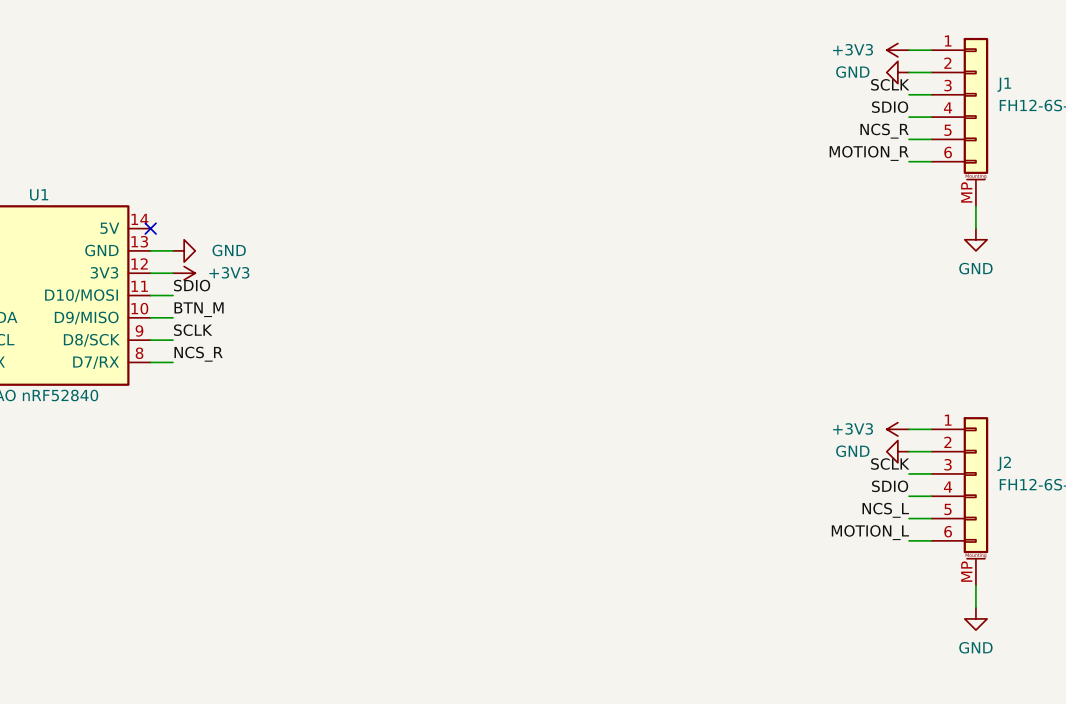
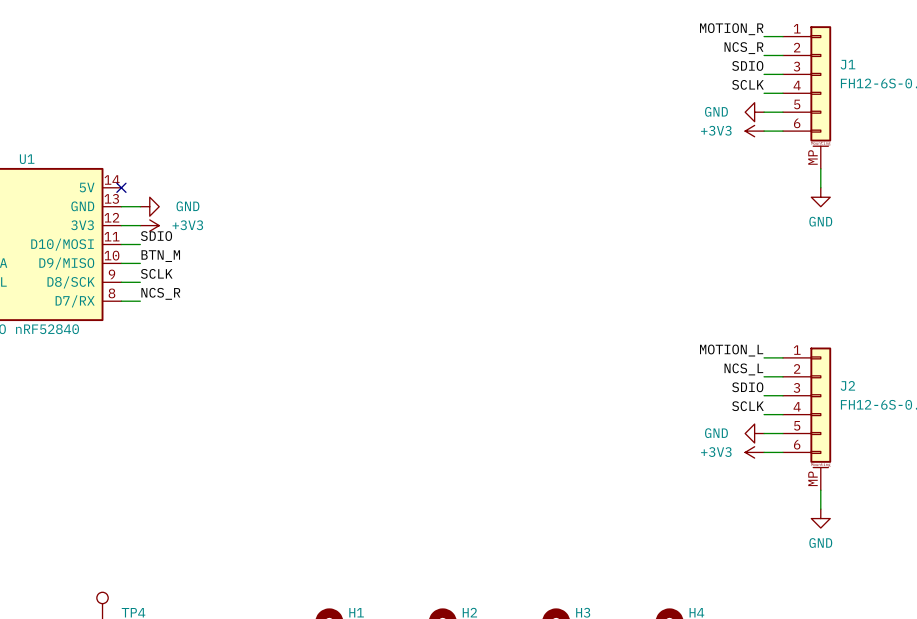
power symbol position: +3V3 (897, 50) -> +3V3 (754, 131)
power symbol position: GND (897, 72) -> GND (754, 112)
label: SCLK (890, 84) -> SDIO (747, 65)
label: SDIO (890, 107) -> SCLK (747, 84)
label position: NCS_R (884, 131) -> NCS_R (743, 48)
label position: MOTION_R (869, 153) -> MOTION_R (731, 29)
power symbol position: +3V3 (897, 429) -> +3V3 (754, 452)
power symbol position: GND (897, 451) -> GND (754, 433)
label: SCLK (890, 464) -> SDIO (747, 387)
label: SDIO (890, 486) -> SCLK (747, 406)
label position: NCS_L (885, 510) -> NCS_L (743, 369)
label position: MOTION_L (870, 532) -> MOTION_L (731, 350)

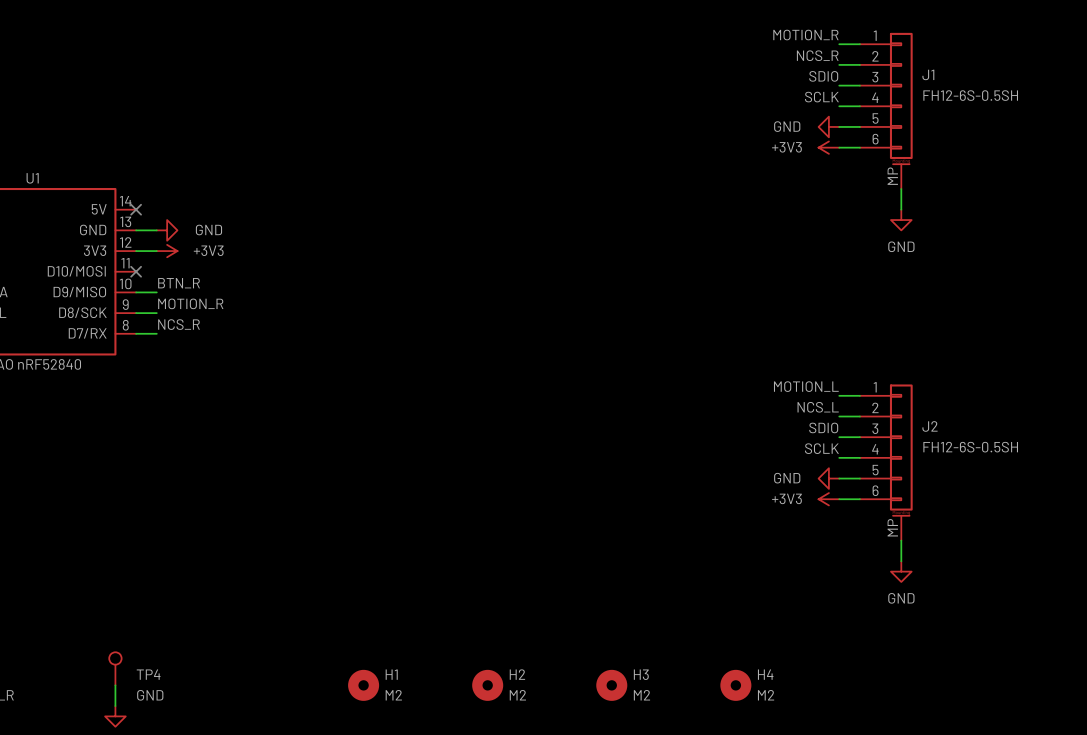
label: SDIO (156, 236) -> none
wire: (121, 244) (140, 244) -> none
no-connect mark: none -> (136, 271)
label: BTN_M (160, 256) -> BTN_R (179, 283)
label: SCLK (156, 273) -> MOTION_R (190, 303)

